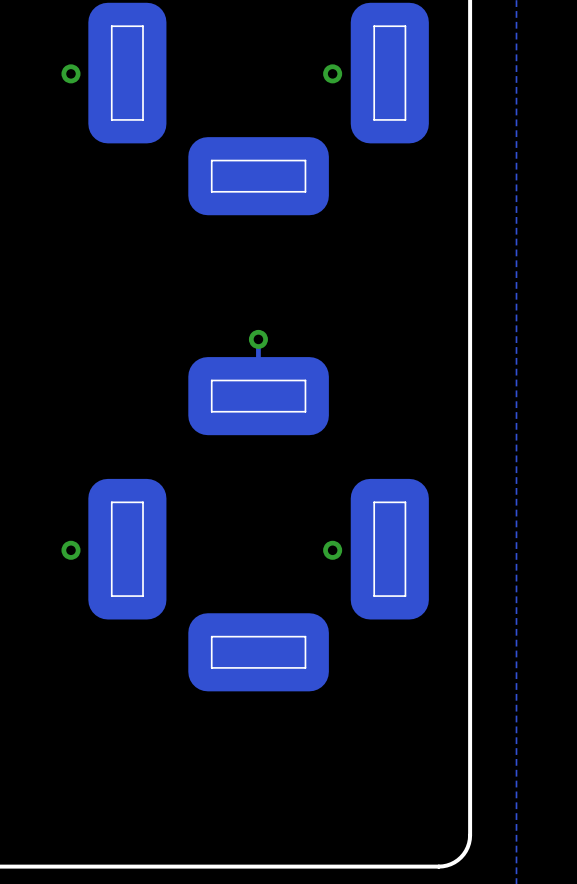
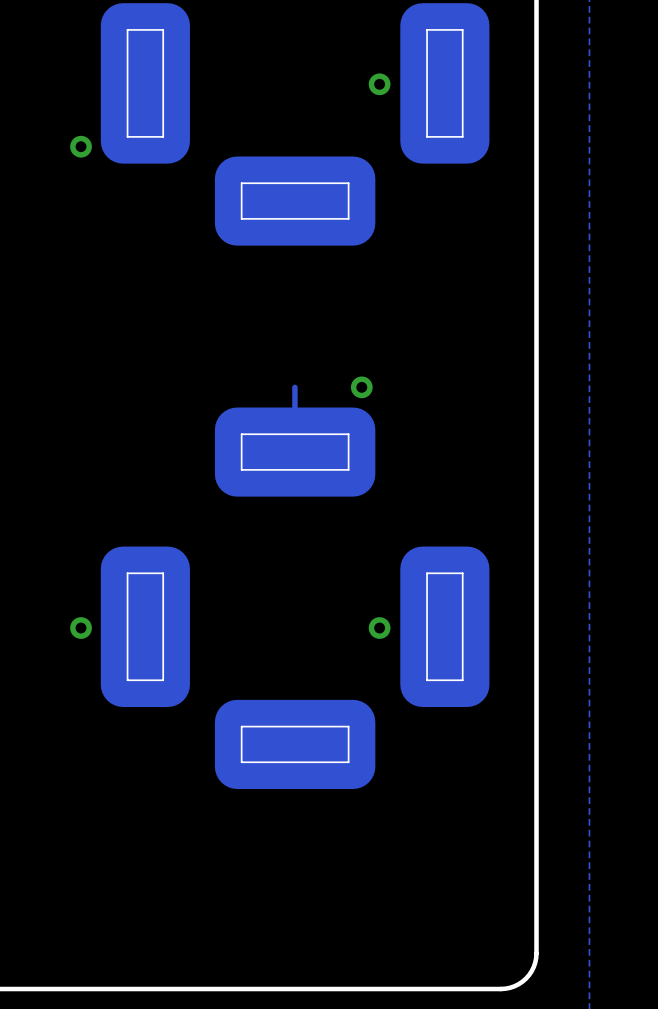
via position: (70, 73) -> (81, 146)
via position: (258, 339) -> (361, 387)

